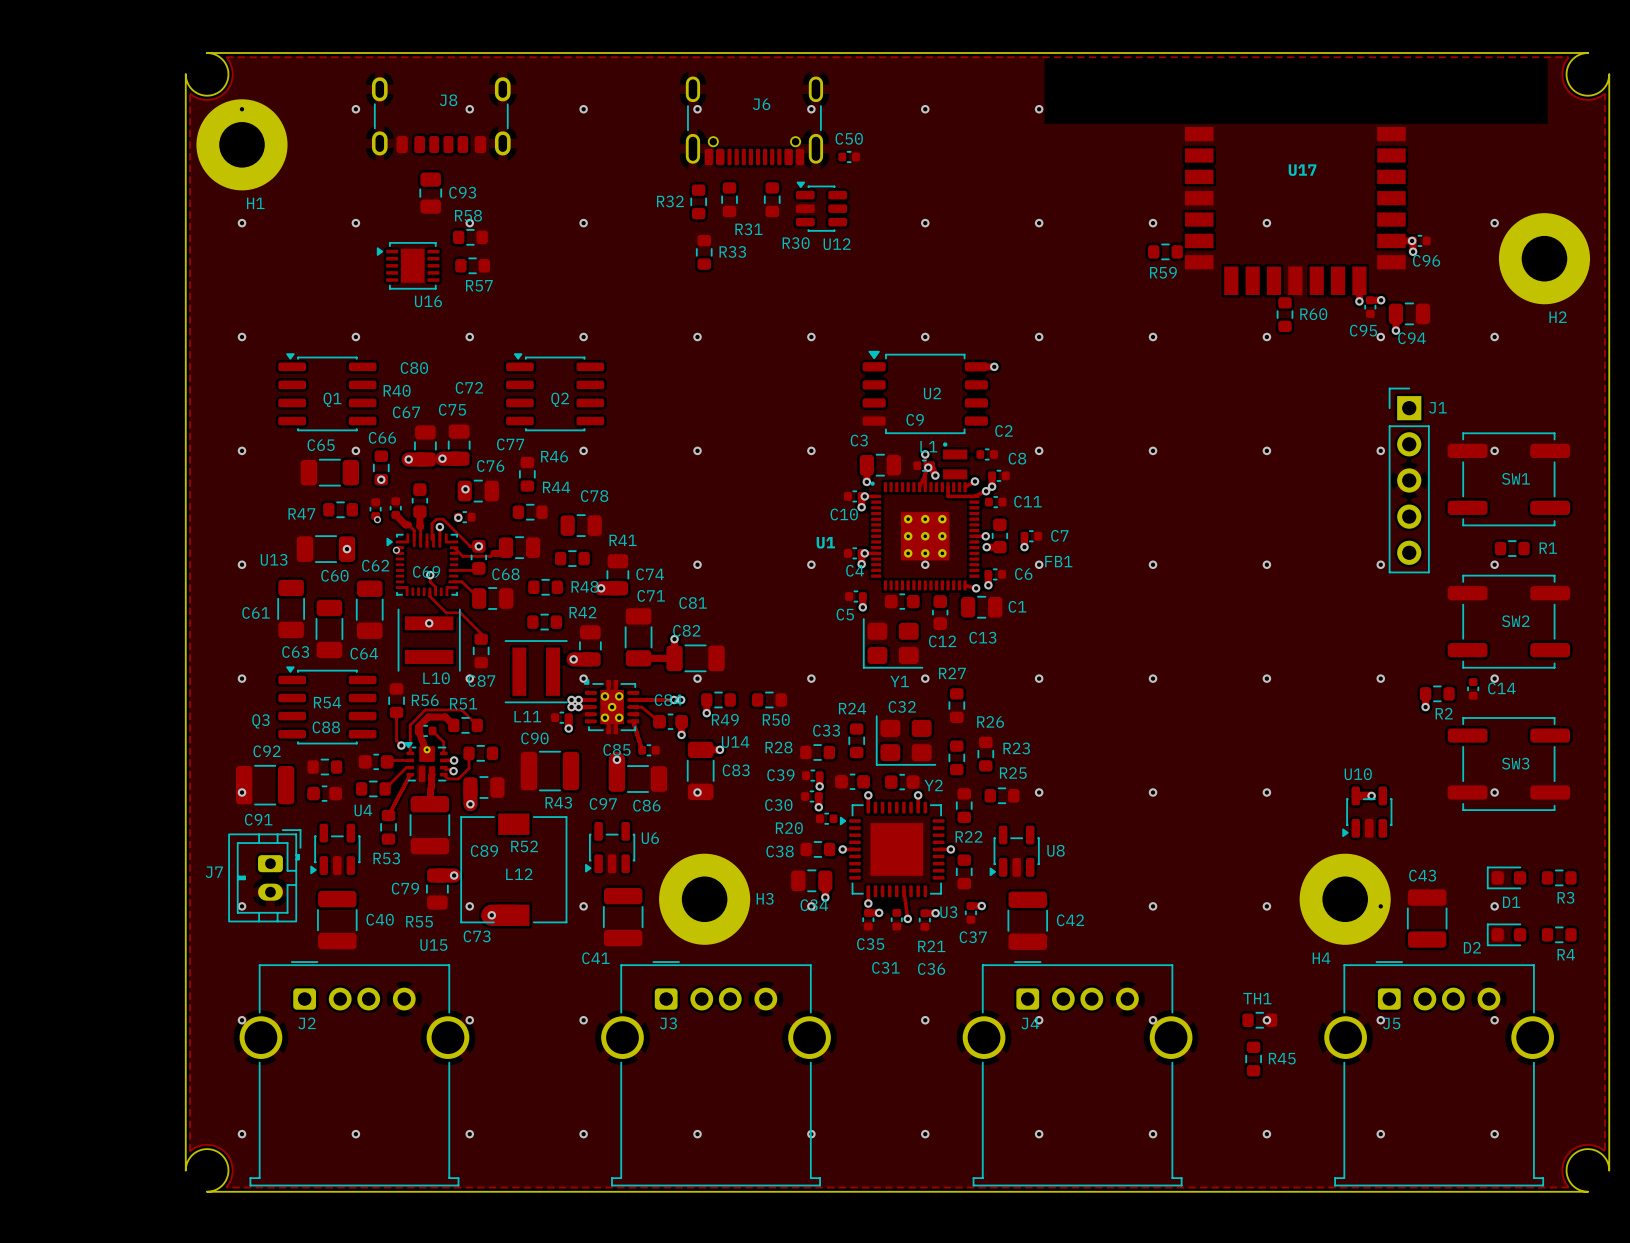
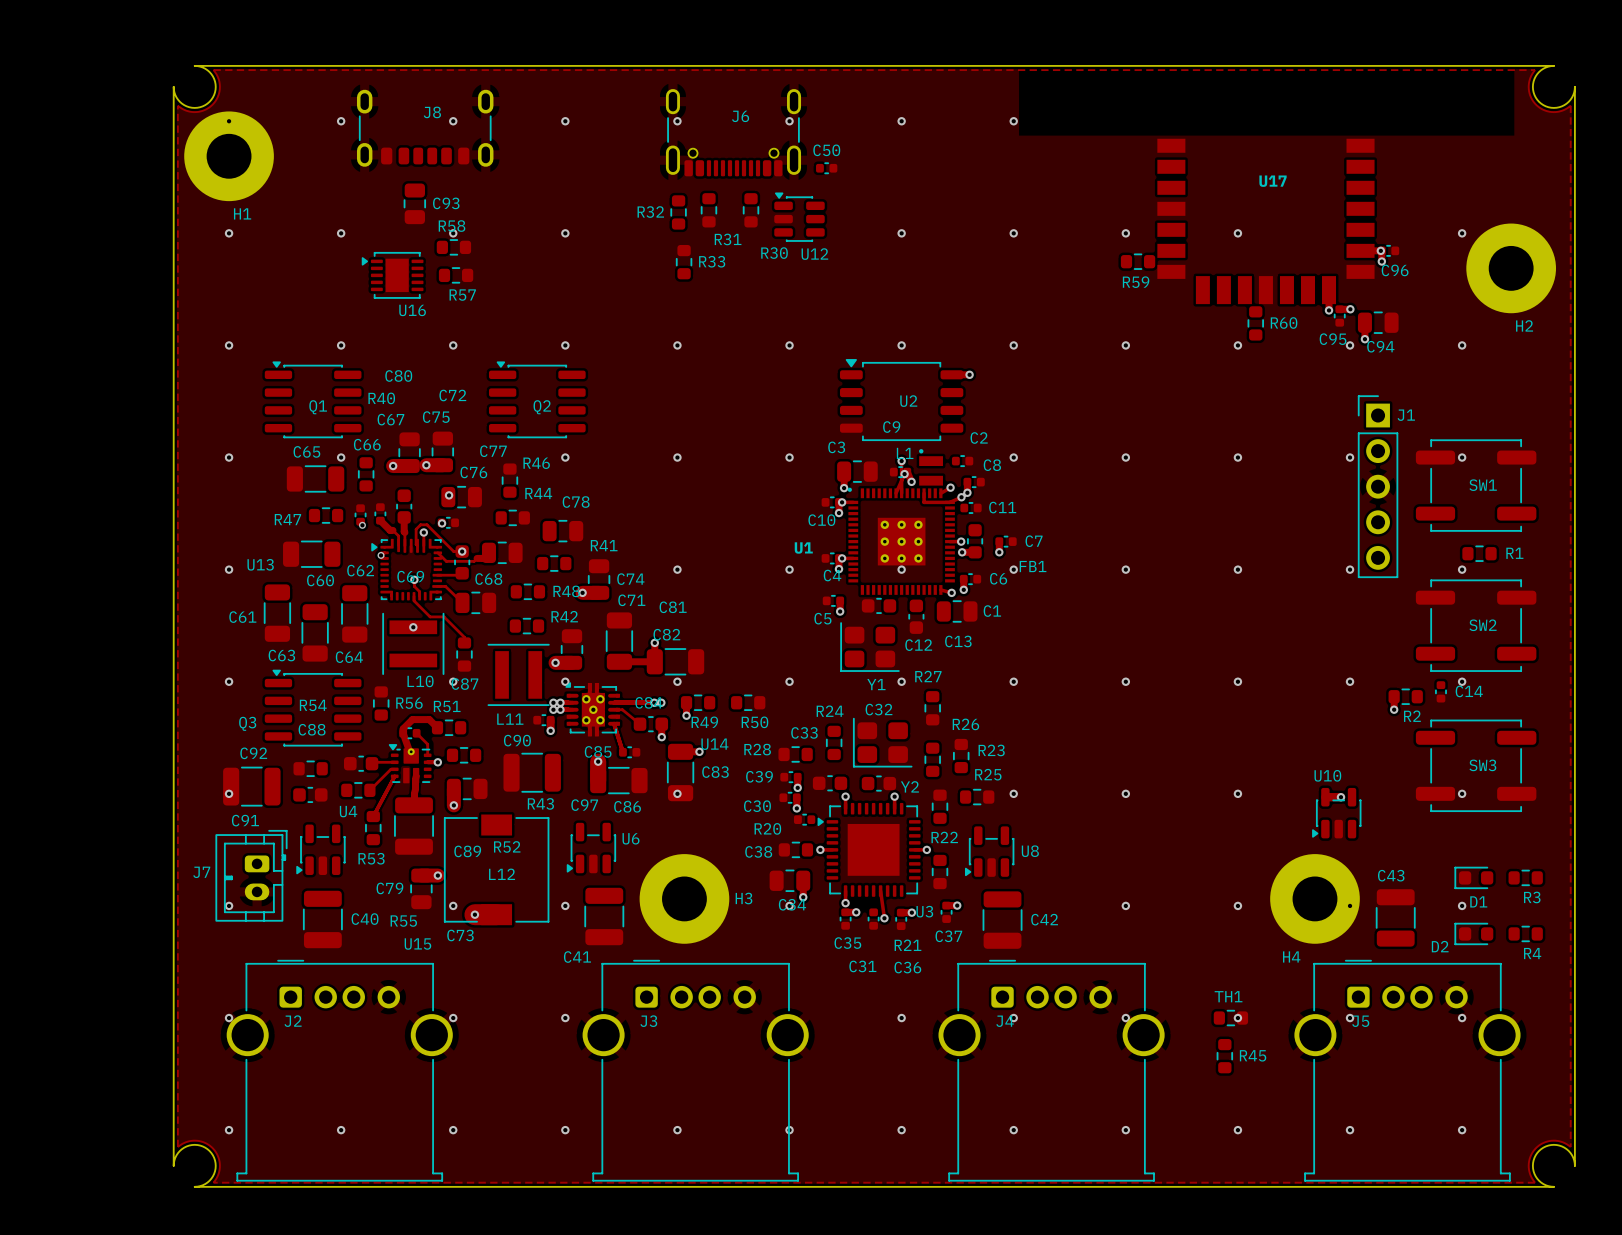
via: (381, 479) -> none
via: (347, 549) -> none
track: (396, 712) (396, 740) (401, 745) -> none
track: (477, 725) (461, 709) (425, 709) (410, 725) (410, 753) -> none
via: (401, 745) -> none
track: (469, 753) (469, 768) (458, 778) (448, 778) (443, 774) -> none
track: (443, 767) (453, 771) -> none
via: (453, 771) -> none

